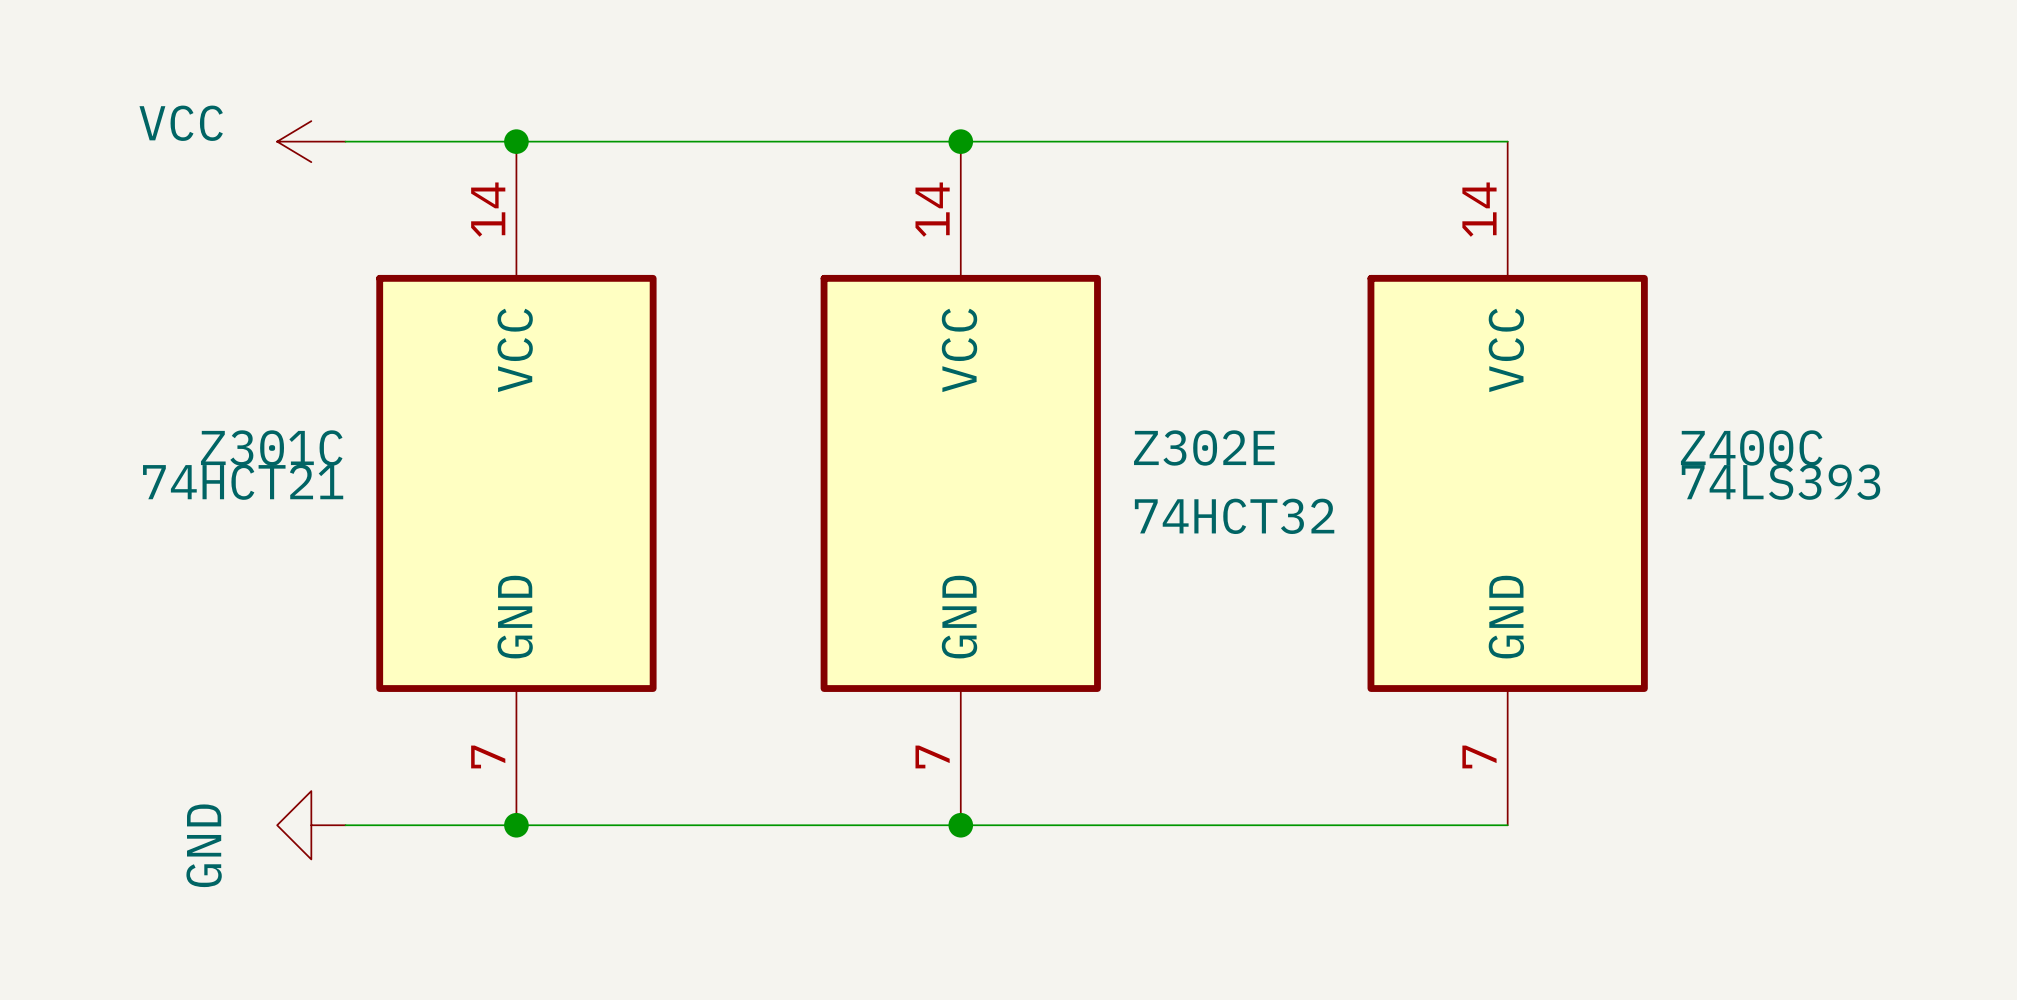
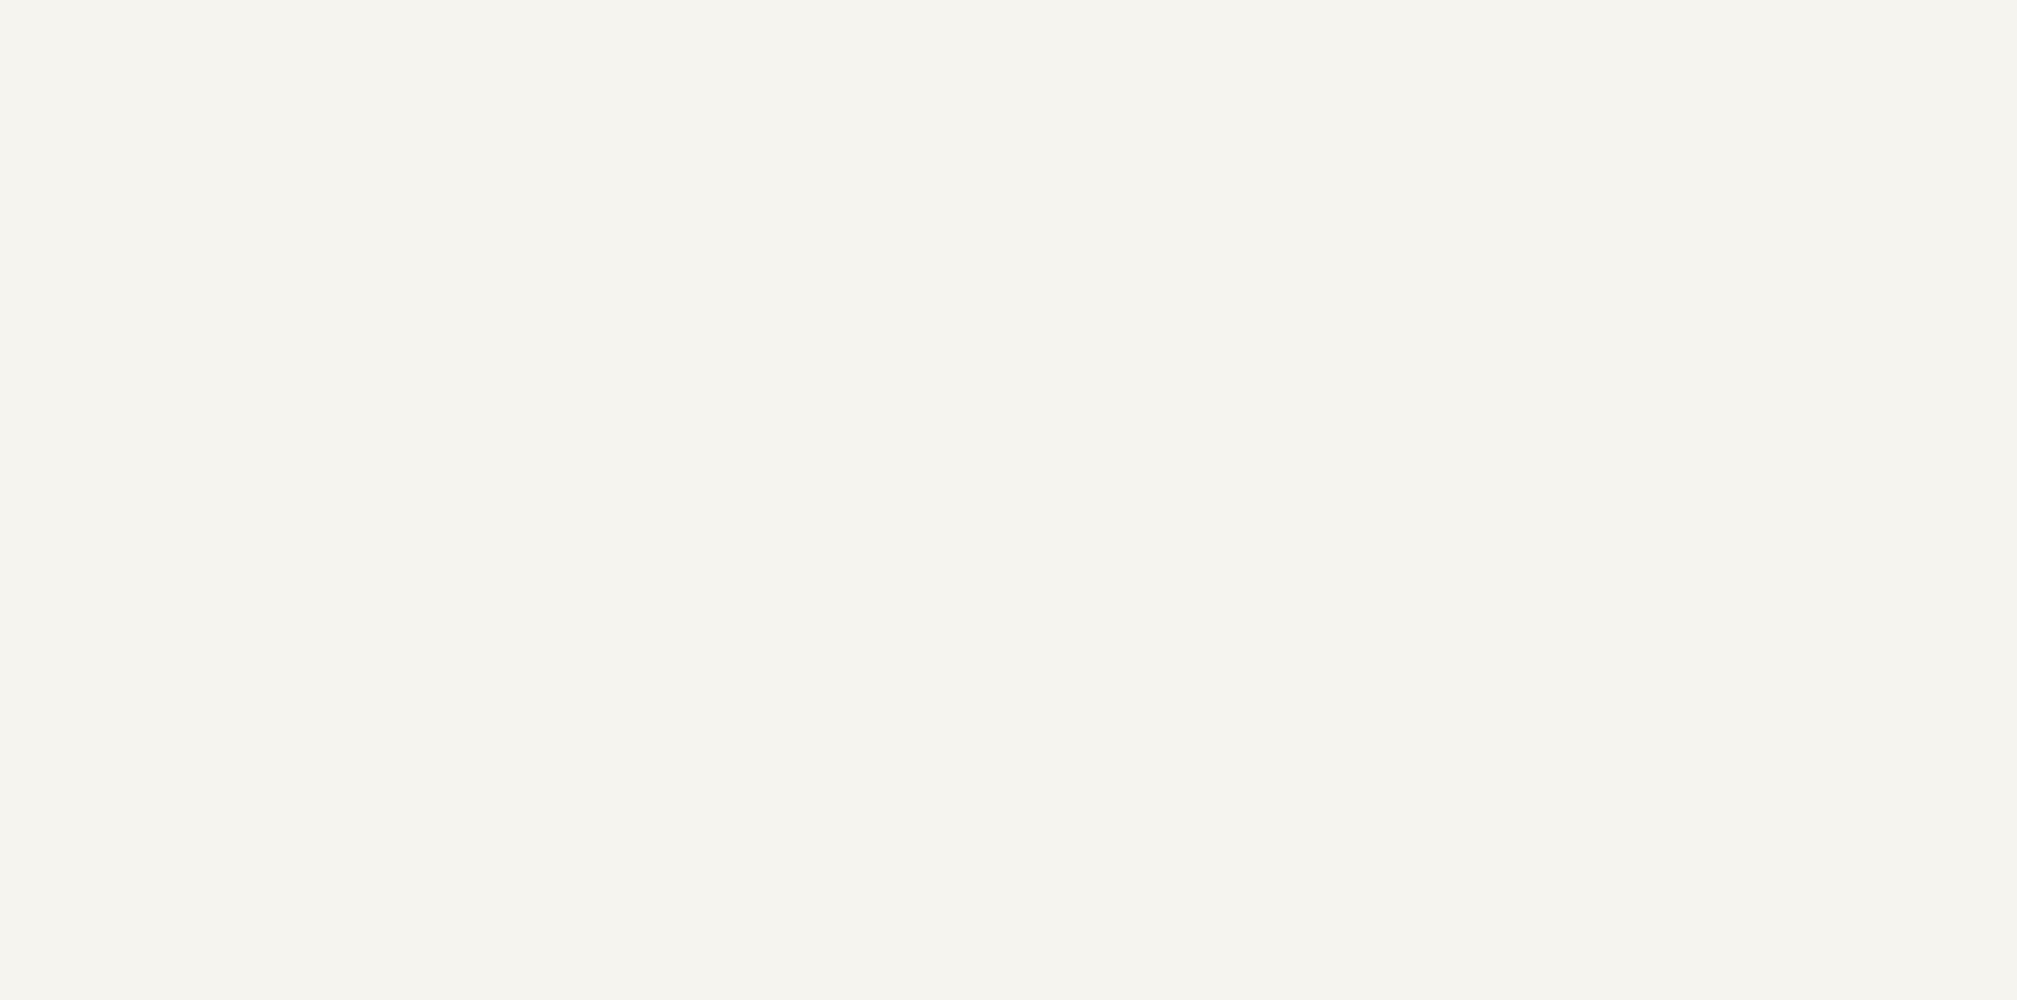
power symbol: VCC (311, 141) -> none
wire: (345, 141) (1507, 141) -> none
junction: (516, 141) -> none
junction: (960, 141) -> none
Z301C: 74HCT21 (516, 483) -> none
Z302E: 74HCT32 (960, 483) -> none
Z400C: 74LS393 (1507, 483) -> none
power symbol: GND (311, 825) -> none
wire: (345, 825) (1507, 825) -> none
junction: (516, 825) -> none
junction: (960, 825) -> none

